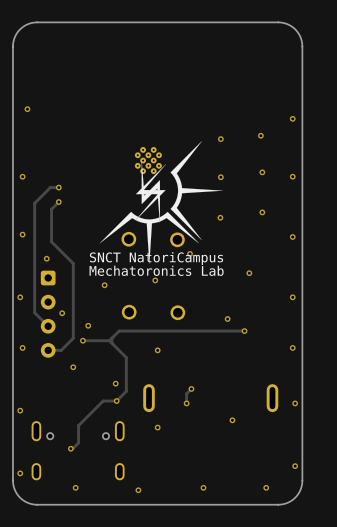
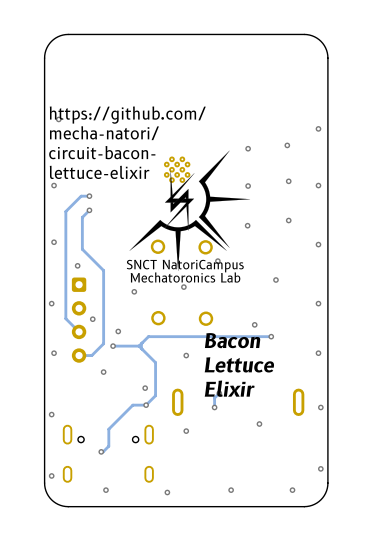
text: none -> https://github.com/ (127, 115)
text: none -> mecha-natori/ (104, 133)
text: none -> circuit-bacon- (102, 152)
text: none -> lettuce-elixir (99, 172)
text: none -> Bacon (232, 340)
text: none -> Lettuce (239, 364)
text: none -> Elixir (229, 388)

